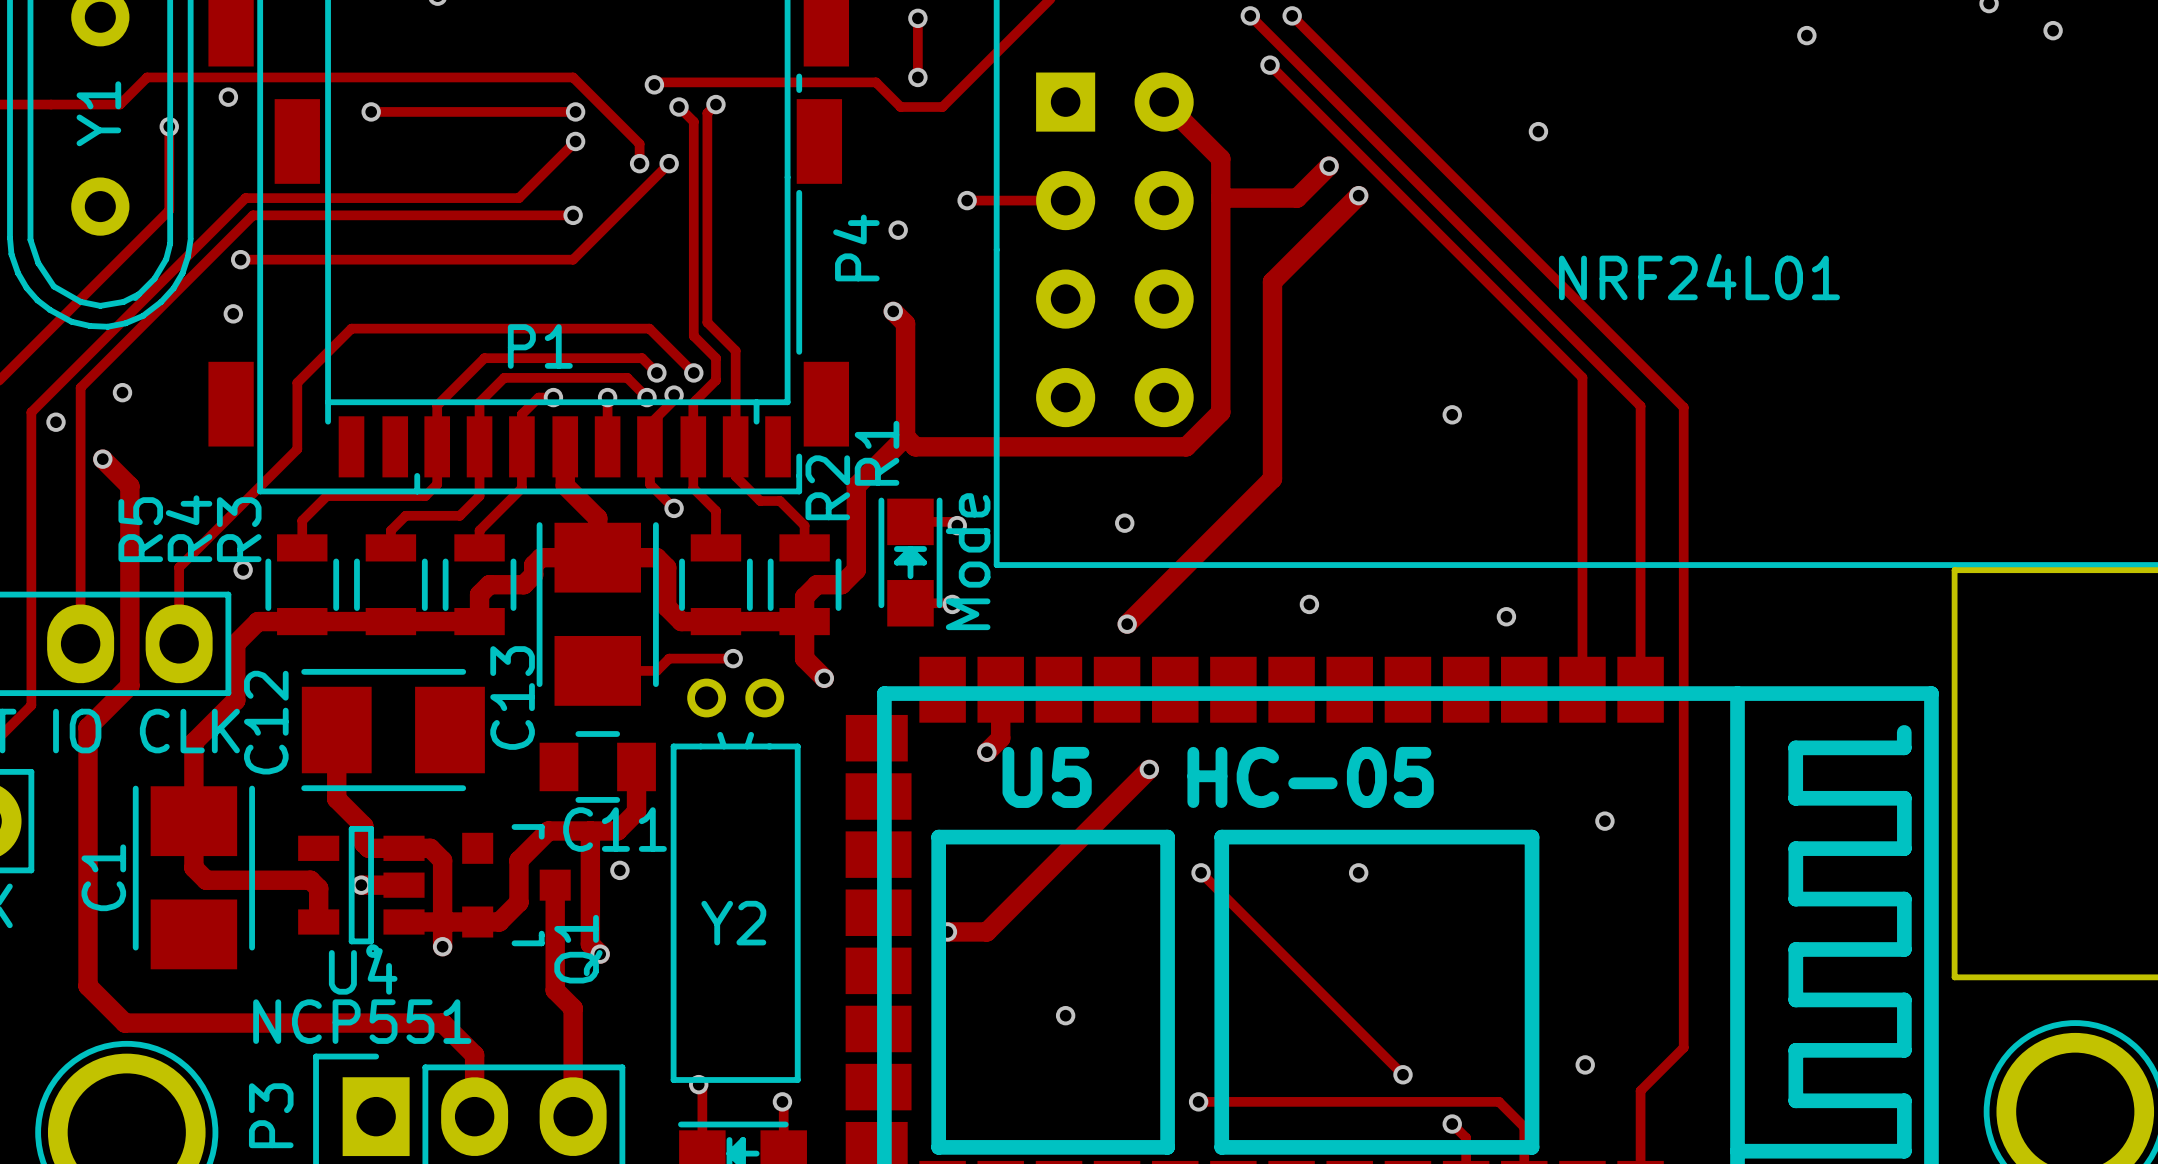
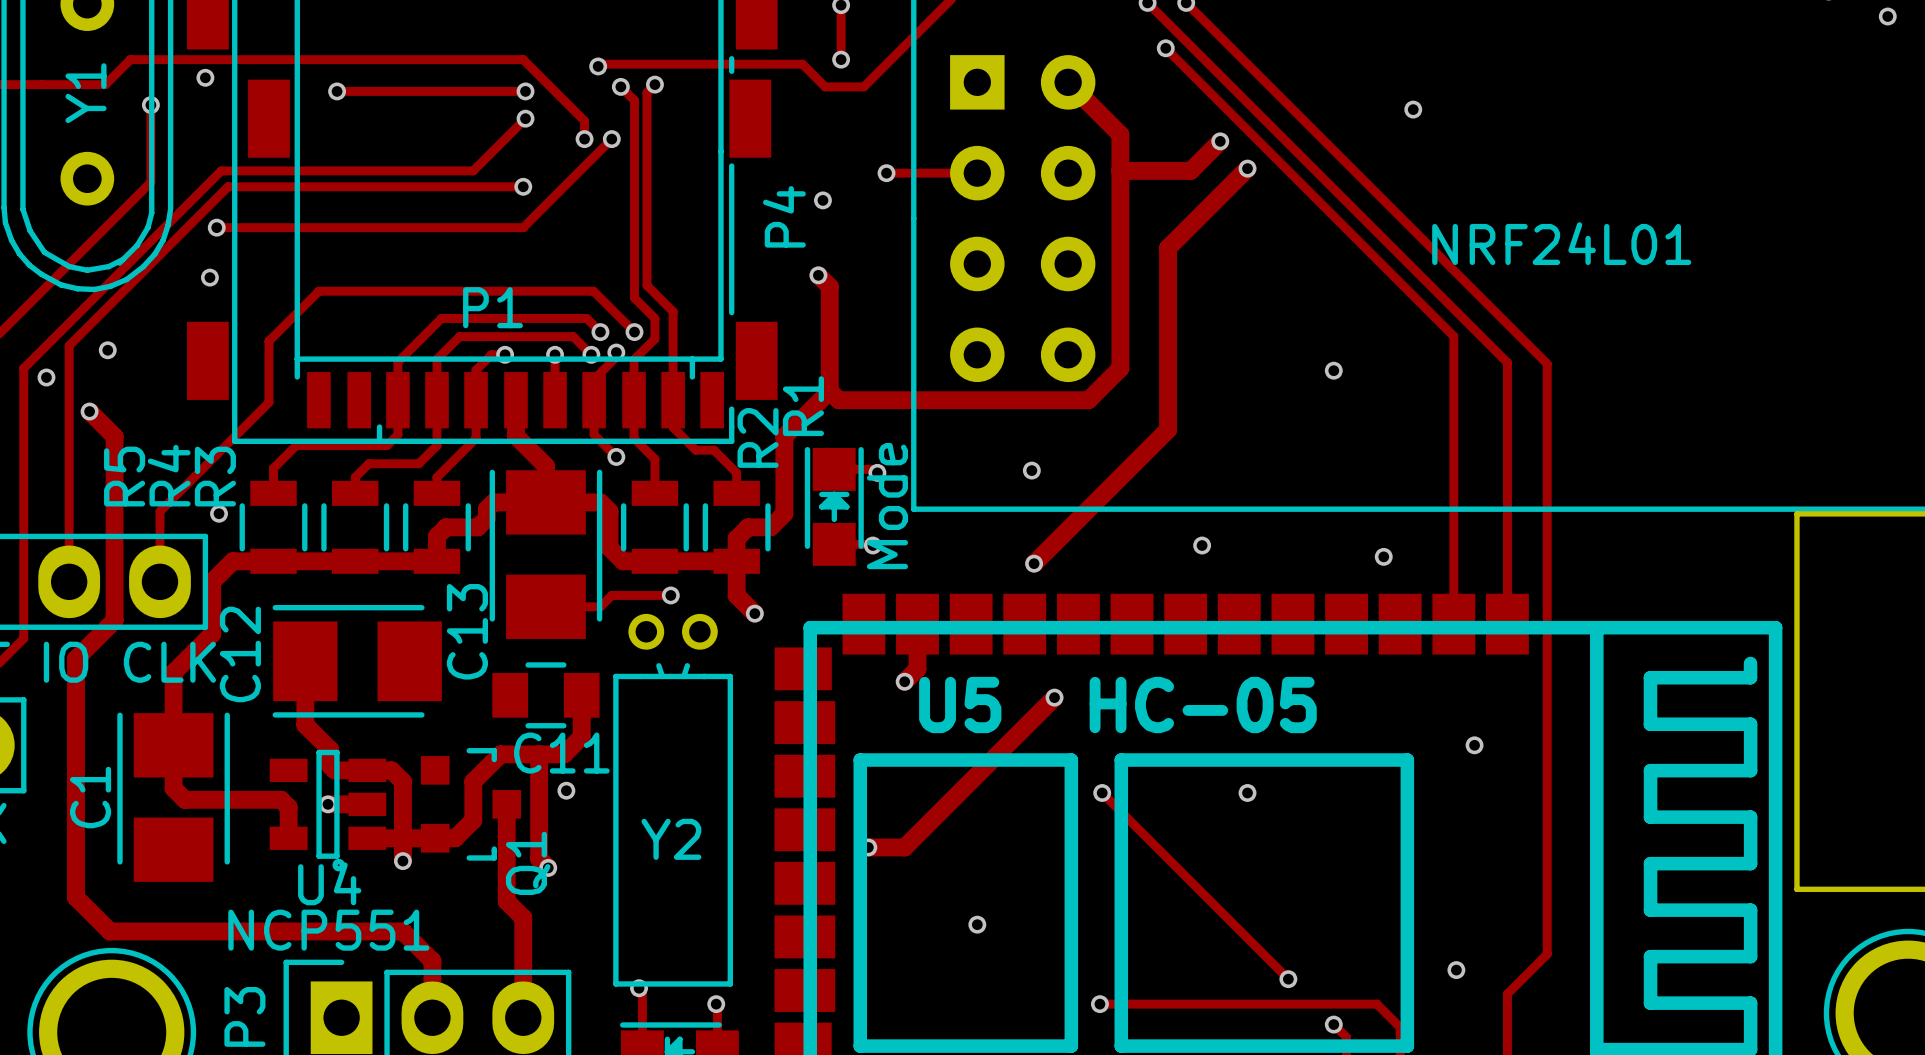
via: (1806, 35) -> none

